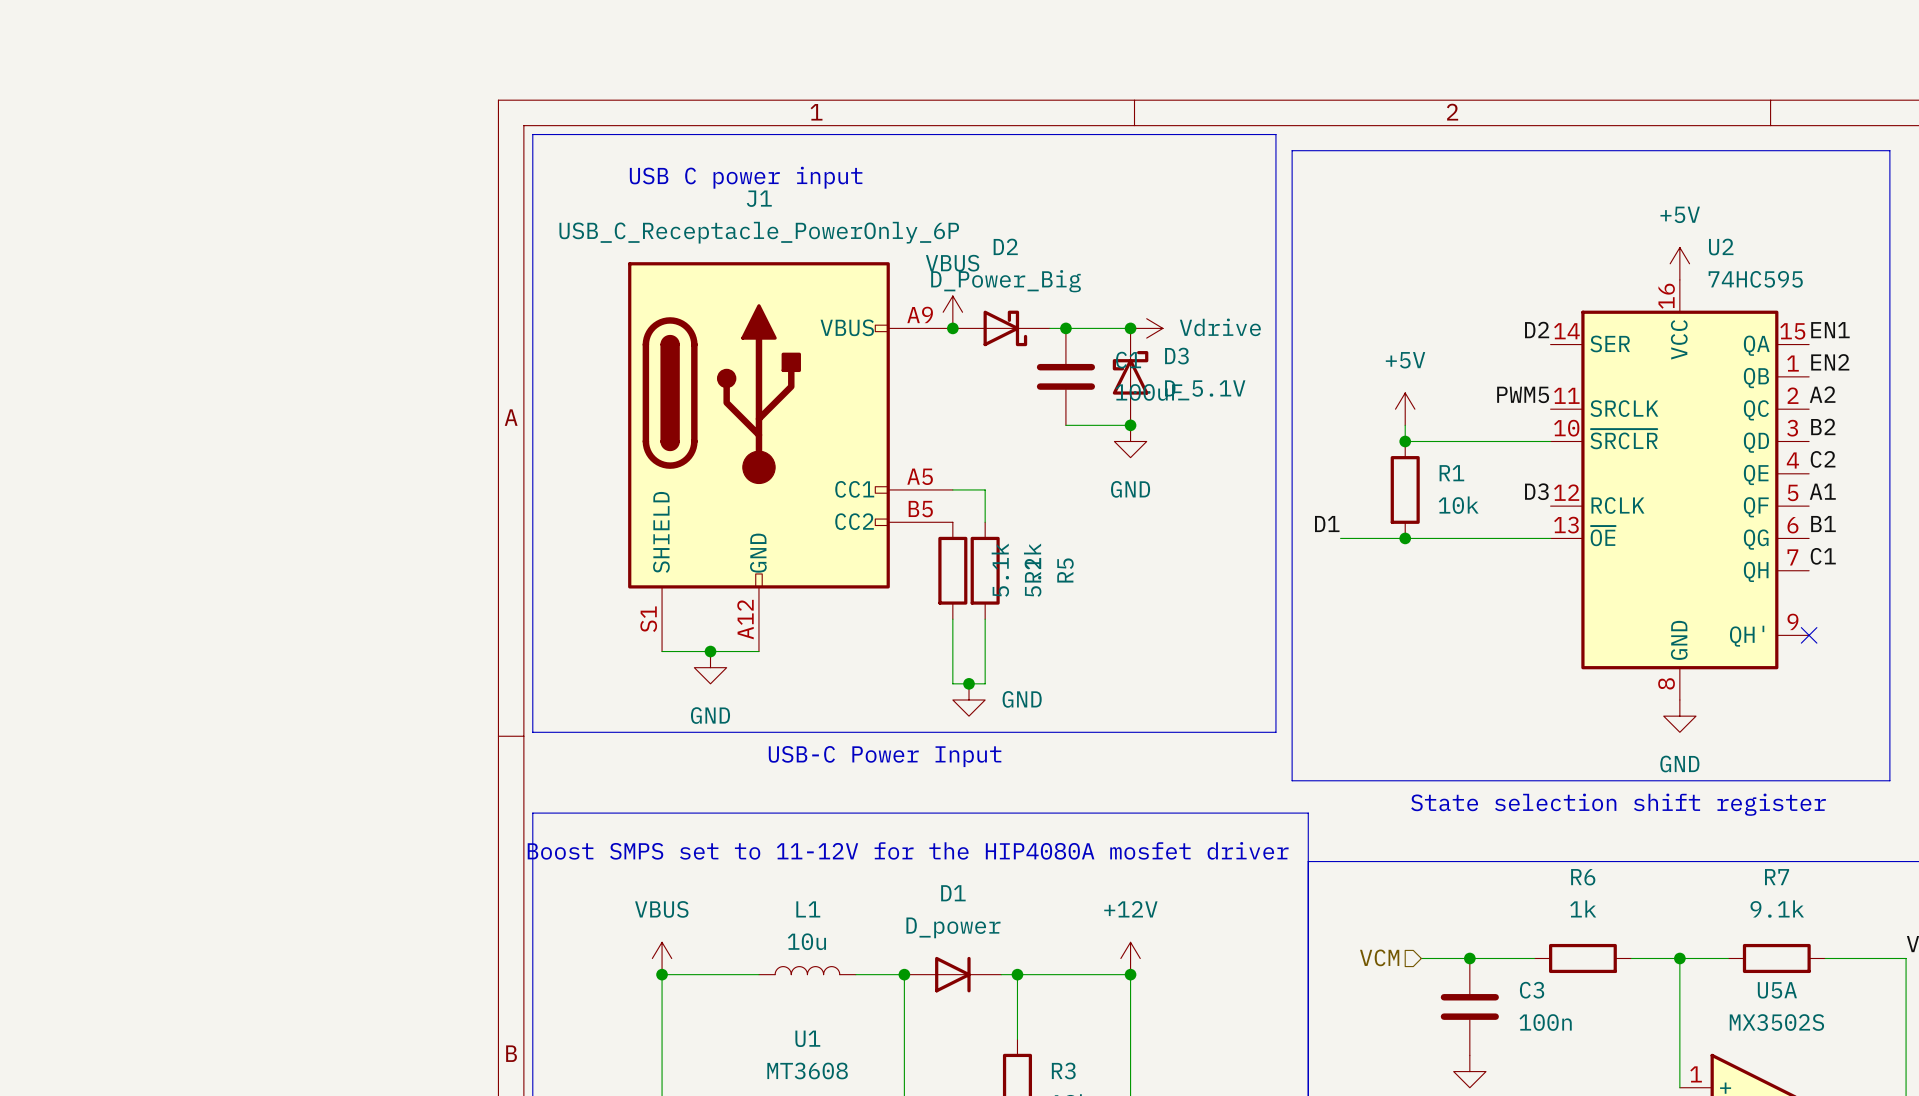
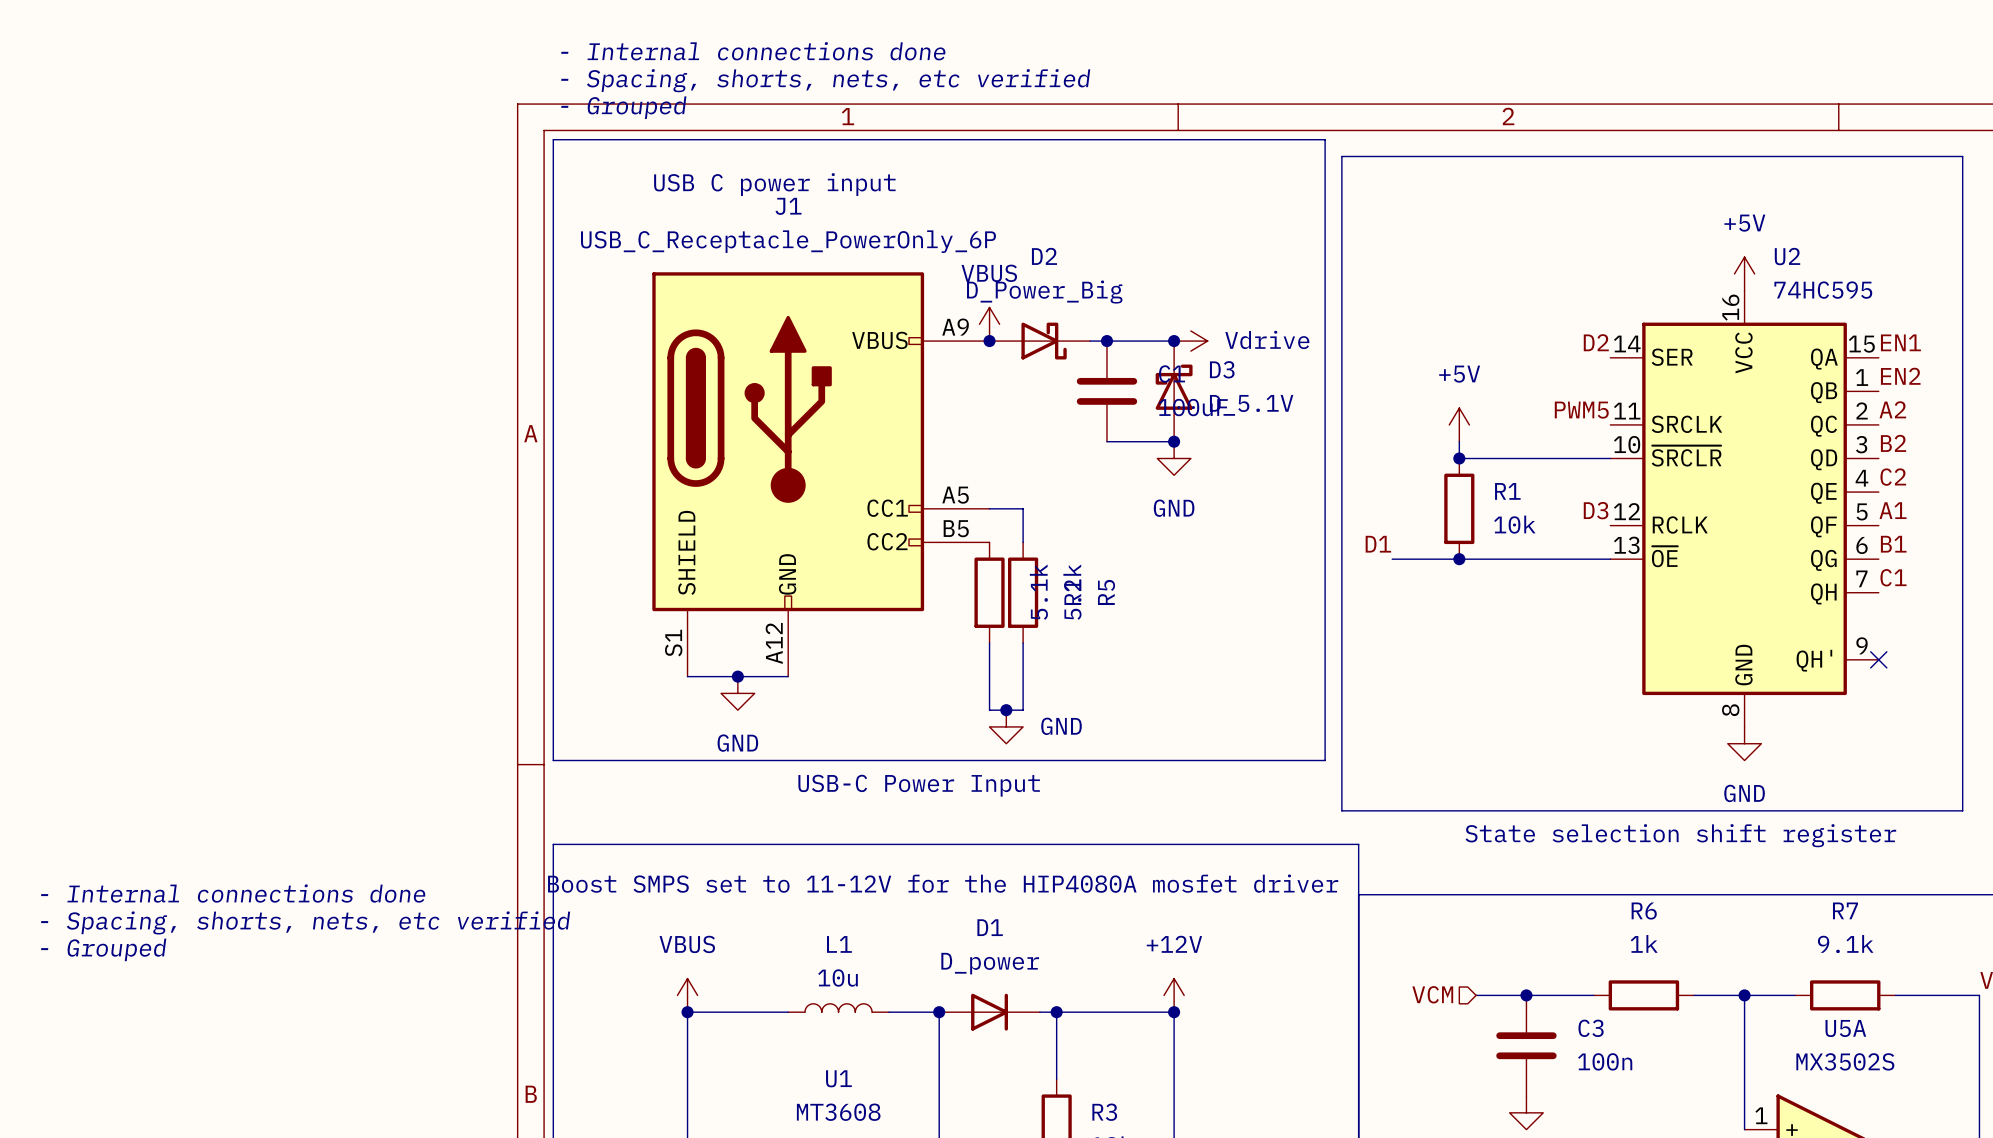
text: none -> - Internal connections done (753, 51)
text: none -> - Spacing, shorts, nets, etc verified (825, 80)
text: none -> - Grouped (623, 107)
text: none -> - Internal connections done (233, 893)
text: none -> - Spacing, shorts, nets, etc verified (305, 922)
text: none -> - Grouped (103, 949)

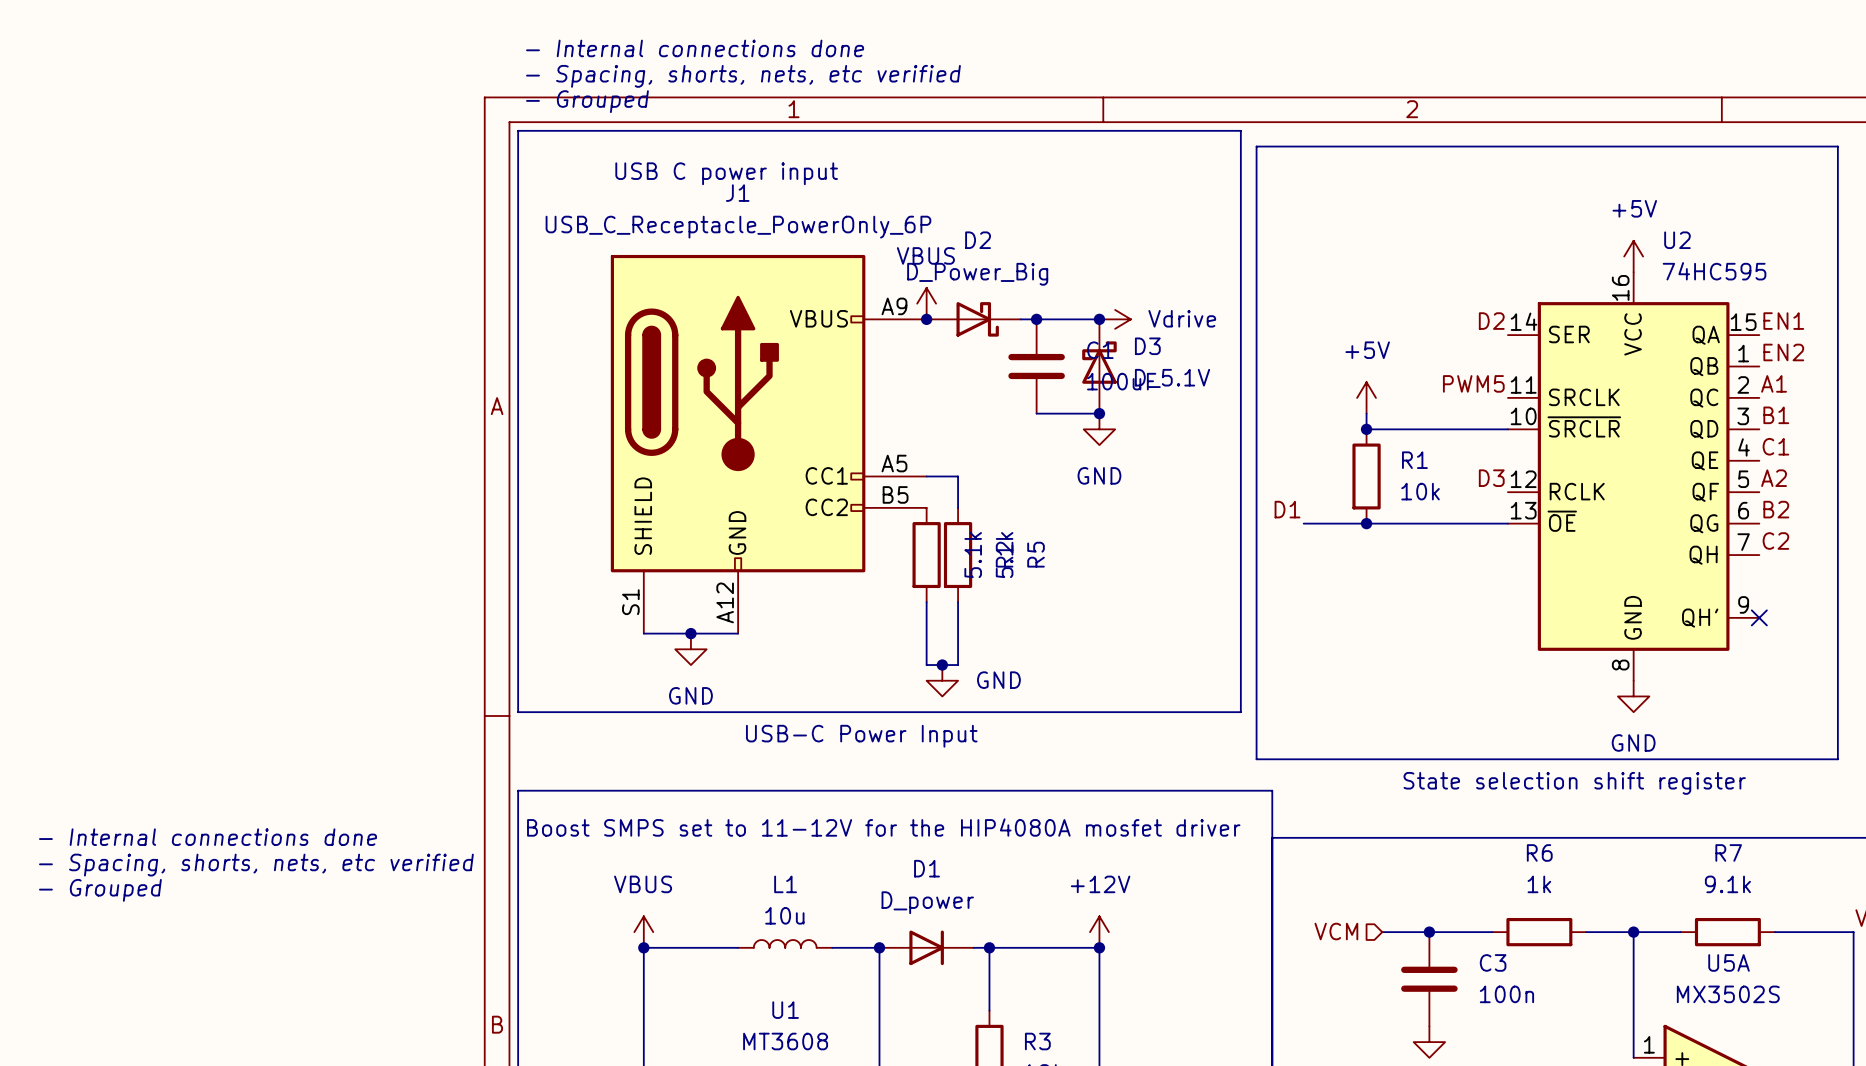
label: A2 (1892, 409) -> A1 (1774, 383)
label: B2 (1893, 443) -> B1 (1776, 415)
label: C2 (1893, 477) -> C1 (1775, 446)
label: A1 (1893, 510) -> A2 (1774, 478)
label: B1 (1893, 544) -> B2 (1776, 509)
label: C1 (1893, 577) -> C2 (1775, 541)

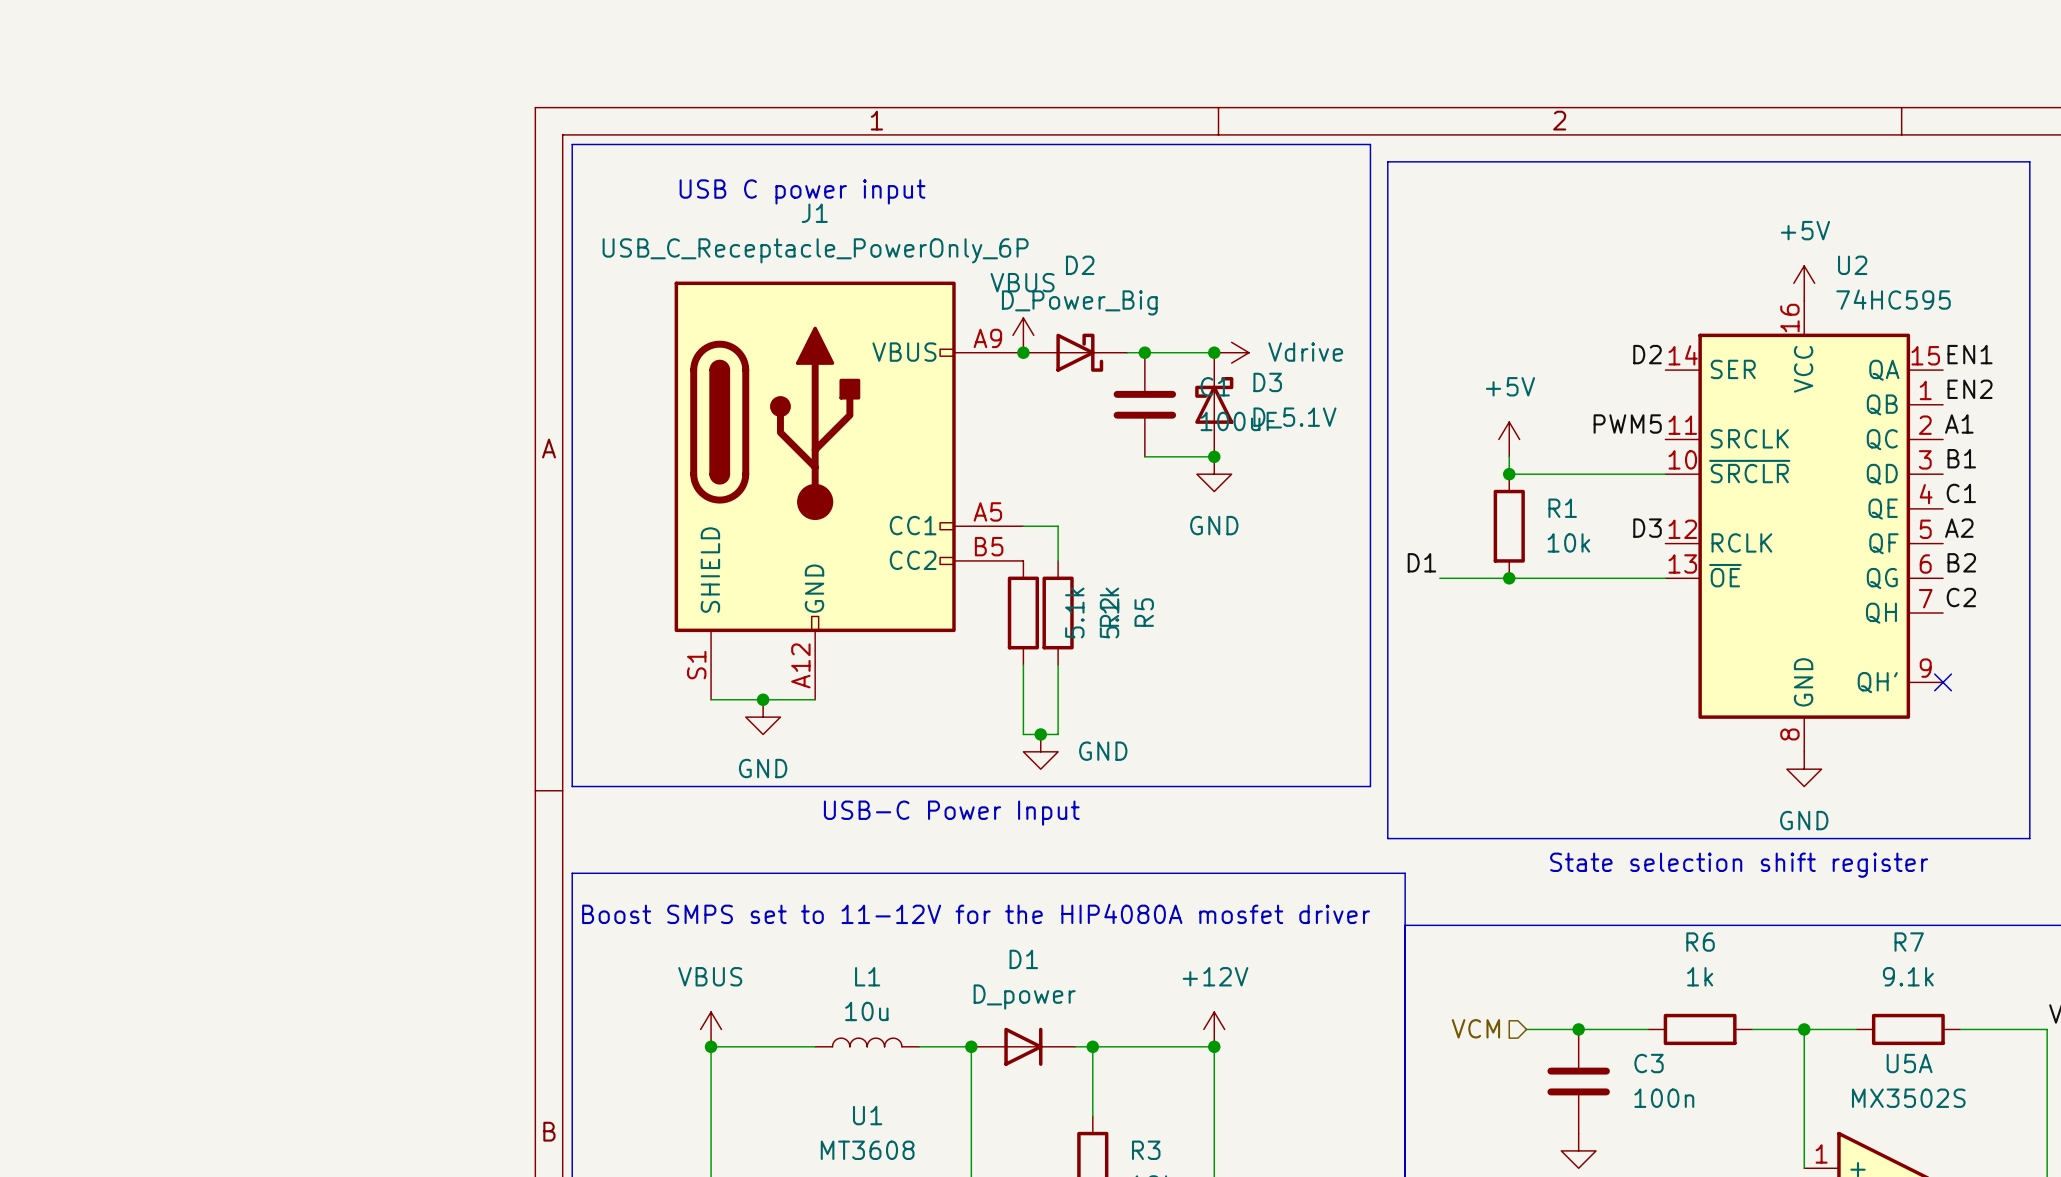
text: - Internal connections done (695, 48) -> none
text: - Spacing, shorts, nets, etc verified (743, 76) -> none
text: - Grouped (587, 101) -> none
text: - Internal connections done (208, 837) -> none
text: - Spacing, shorts, nets, etc verified (256, 865) -> none
text: - Grouped (100, 890) -> none

